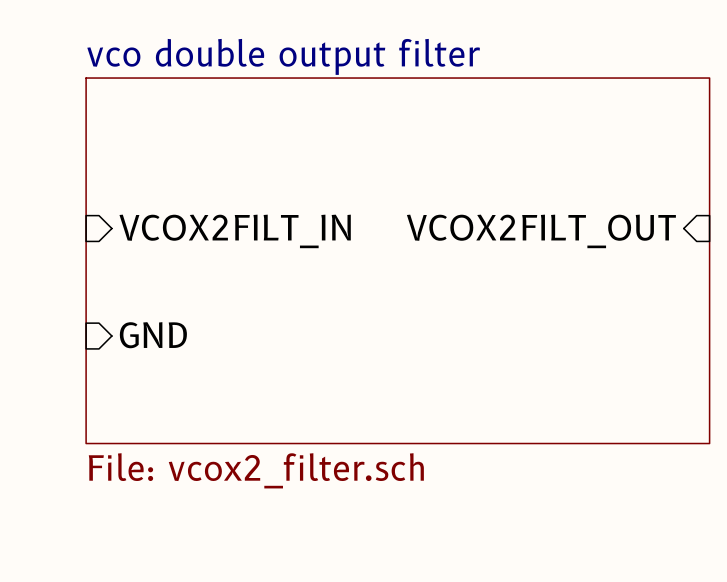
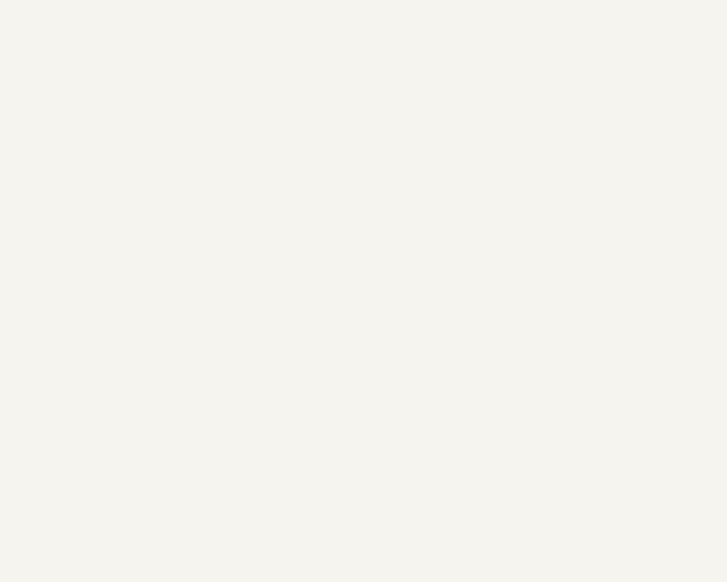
sheet pin: VCOX2FILT_IN (235, 231) -> none
sheet pin: VCOX2FILT_OUT (541, 231) -> none
sheet vco double output filter: File: vcox2_filter.sch (397, 260) -> none
sheet pin: GND (153, 335) -> none

